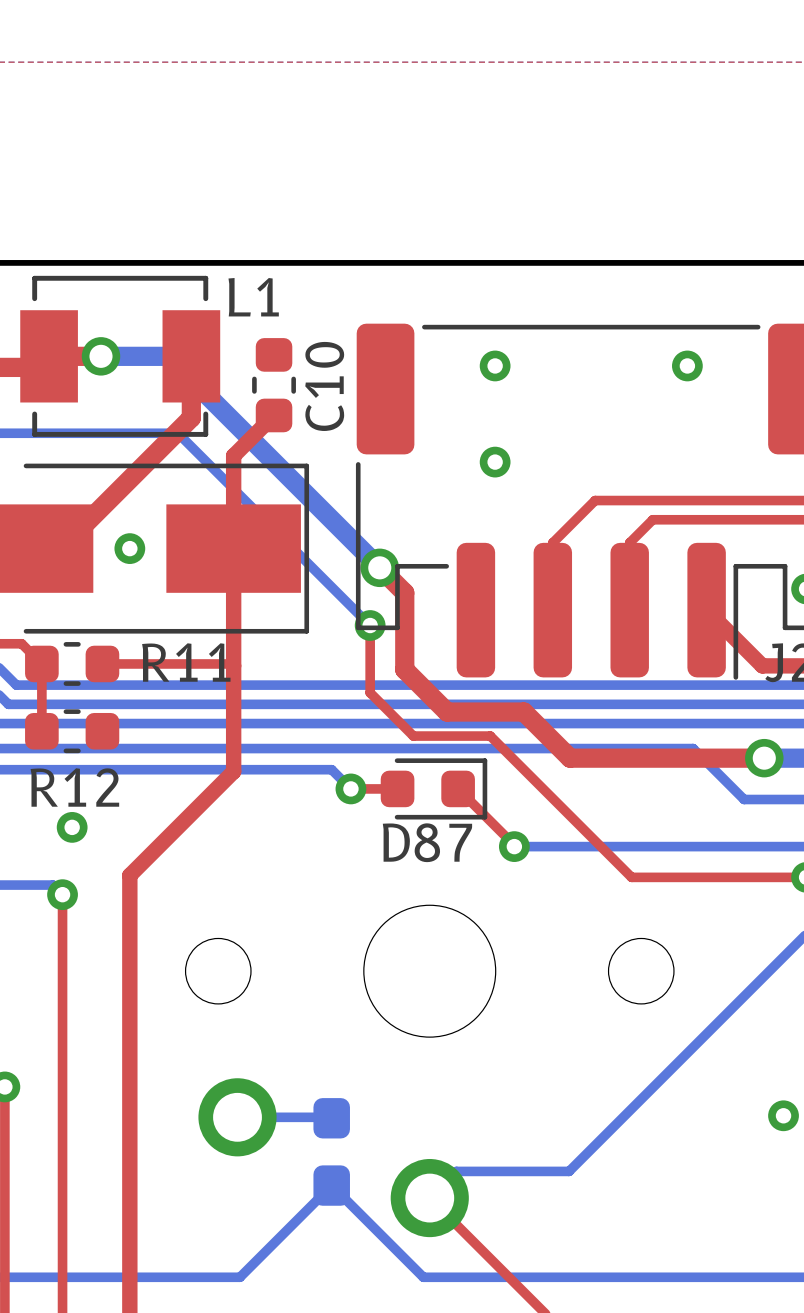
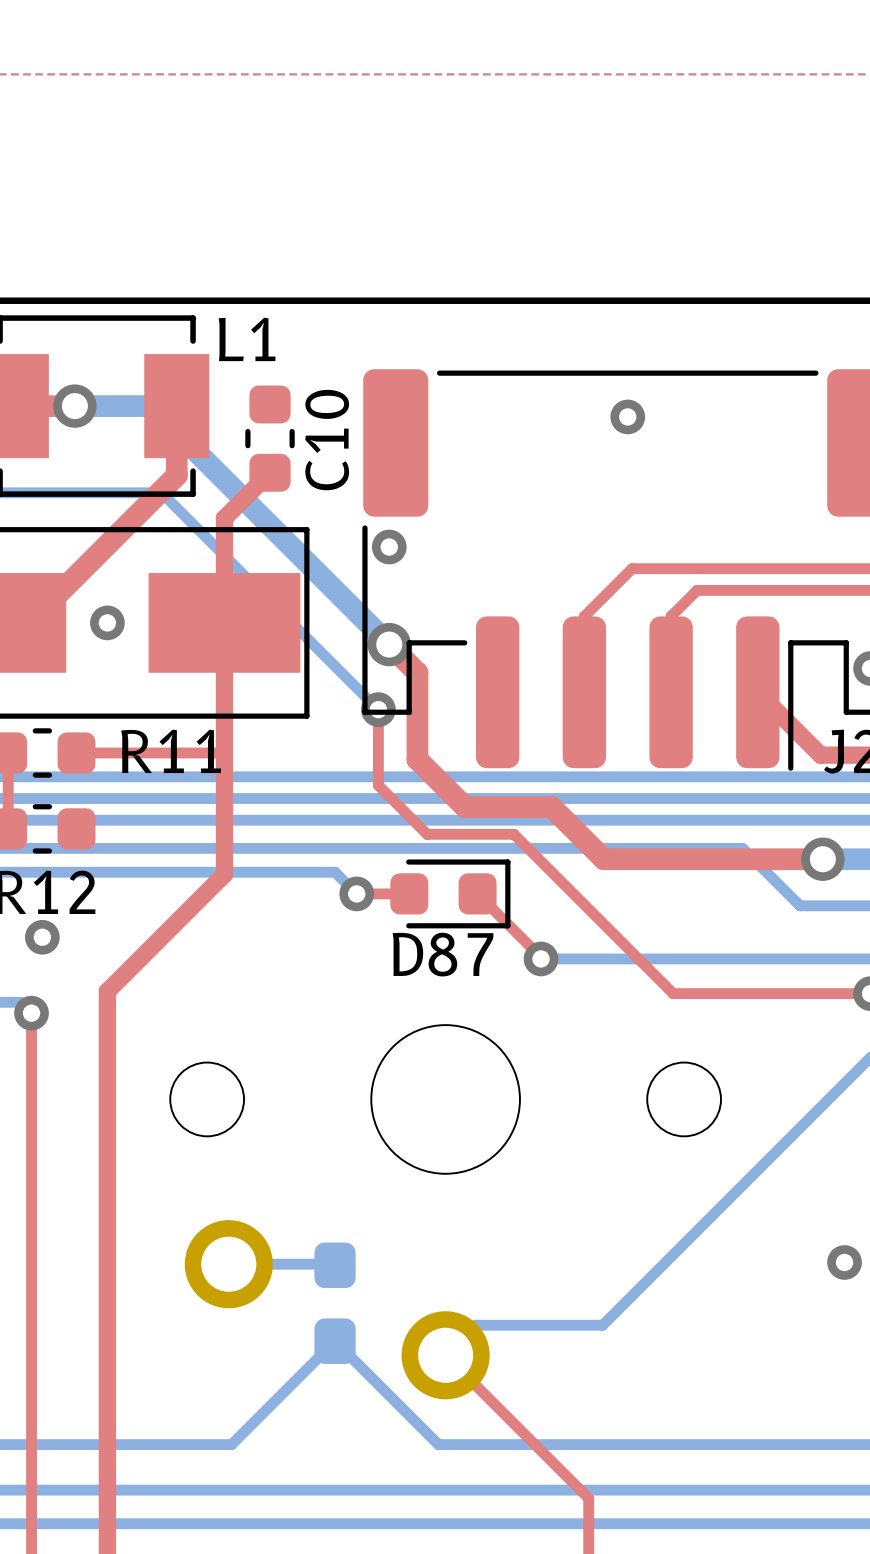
via: (495, 365) -> none
via: none -> (627, 416)
via: (687, 365) -> none
via: (495, 462) -> none
via: none -> (389, 547)

